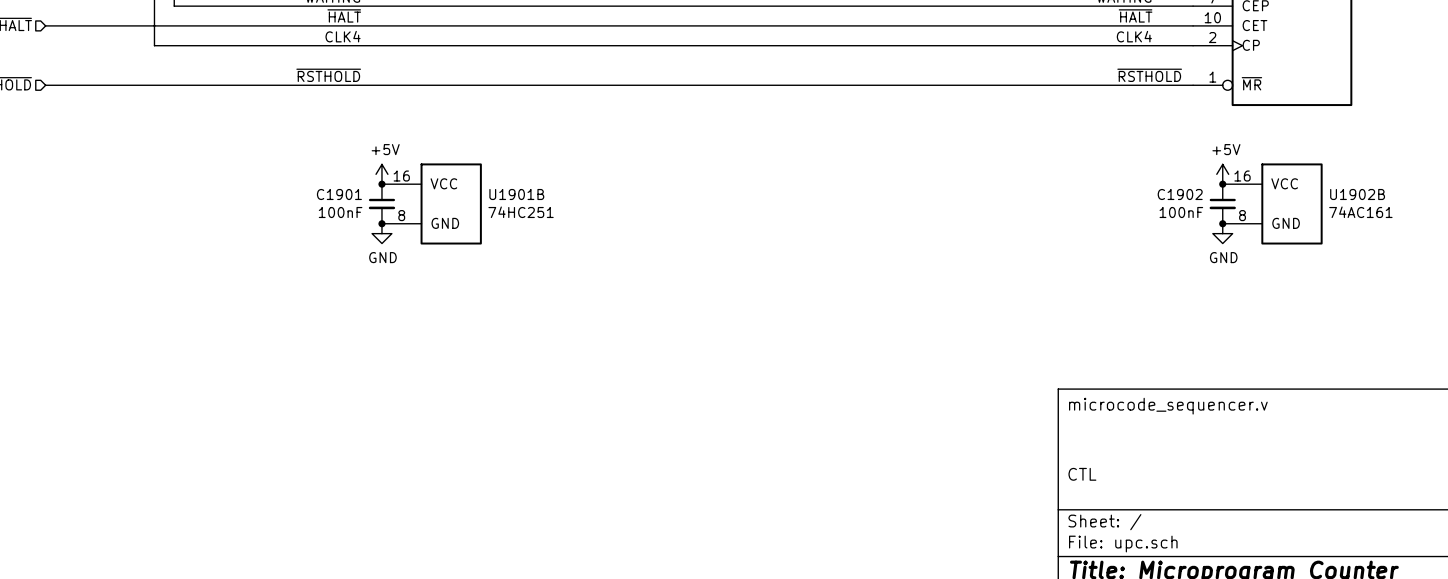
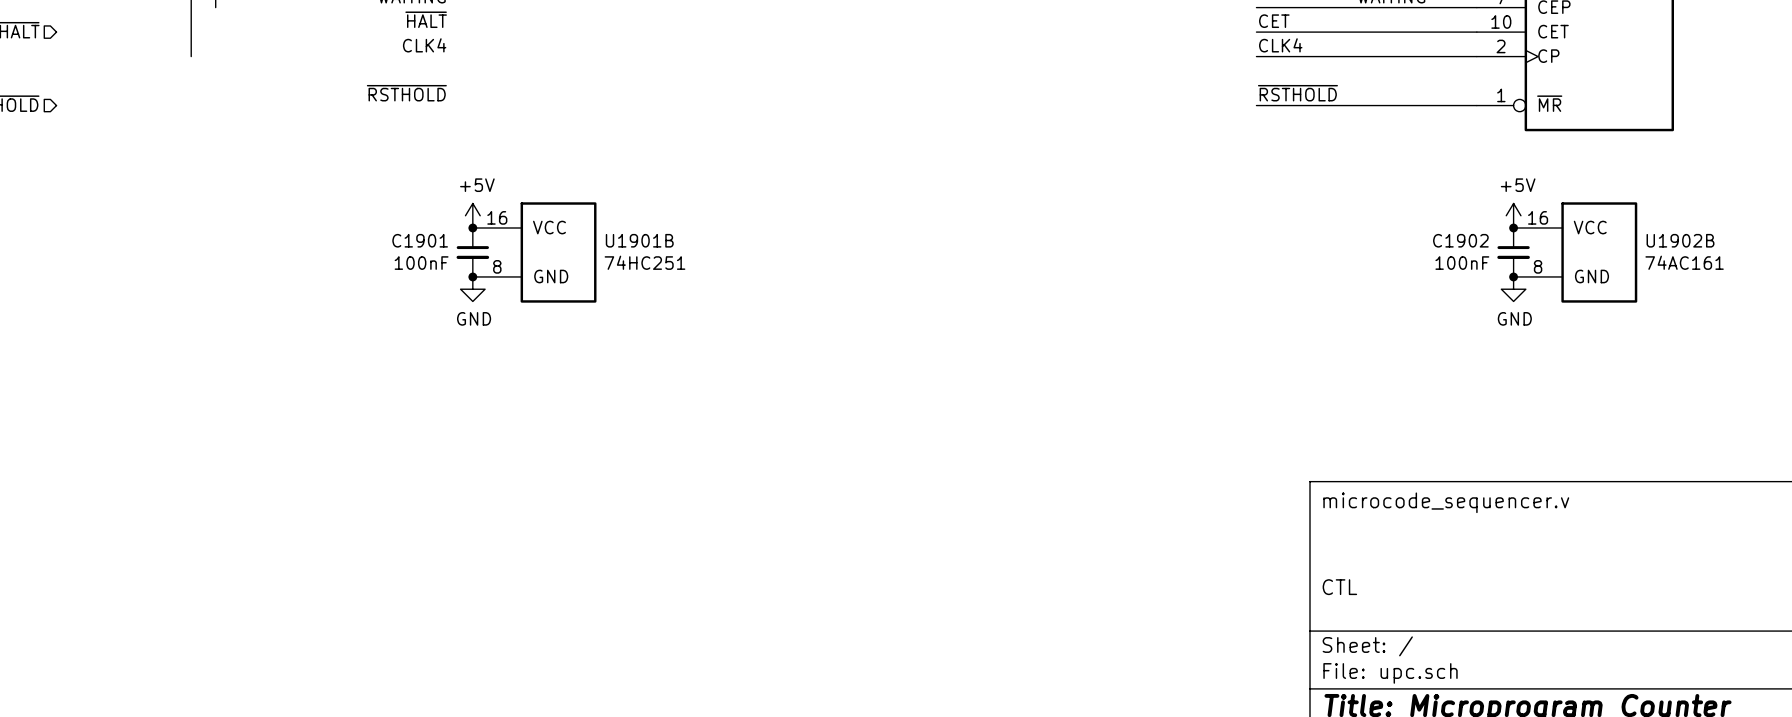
wire: (174, 6) (1015, 6) -> none
label: ~{HALT} (1135, 15) -> none
label: none -> CET (1274, 21)
wire: (45, 25) (1015, 25) -> none
label position: CLK4 (1134, 36) -> CLK4 (1280, 45)
wire: (154, 45) (1015, 45) -> none
label position: ~{RSTHOLD} (1149, 75) -> ~{RSTHOLD} (1297, 93)
wire: (45, 85) (1015, 85) -> none

